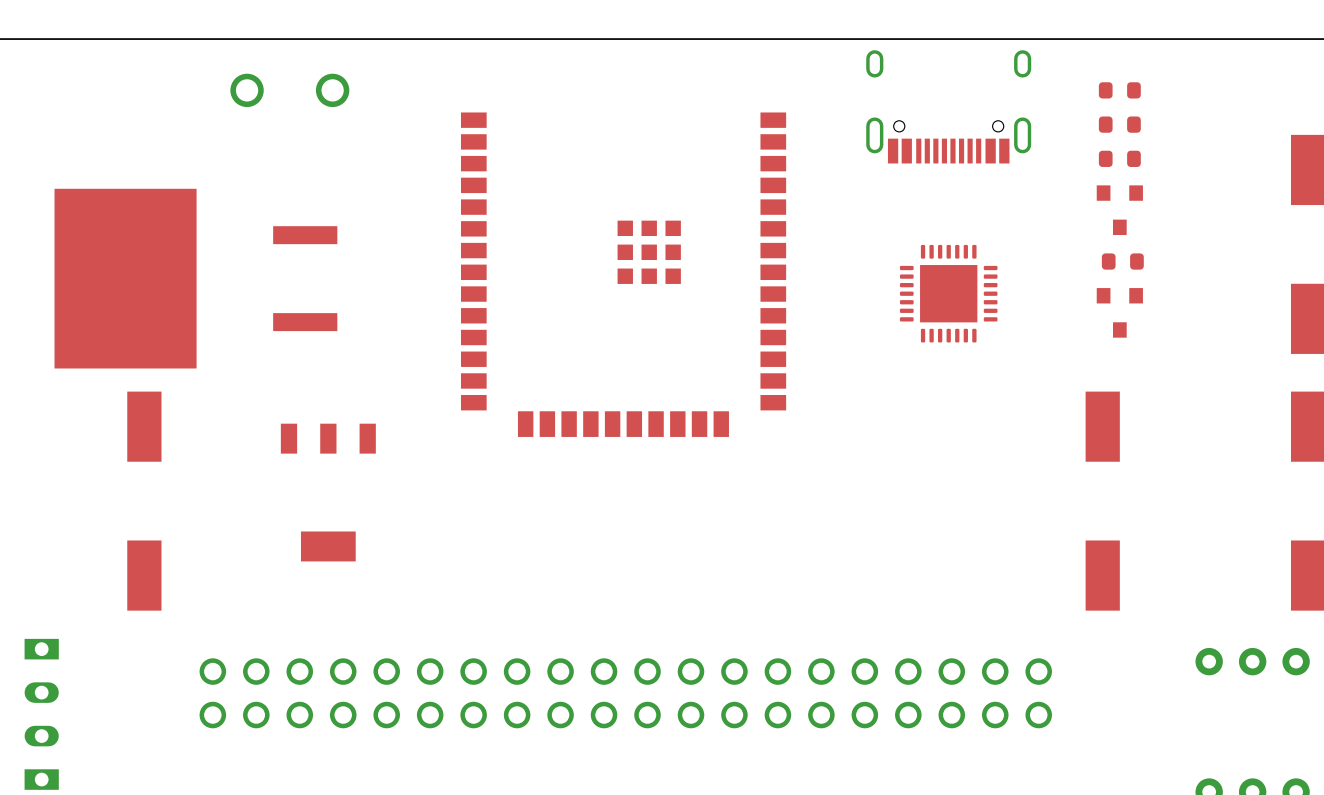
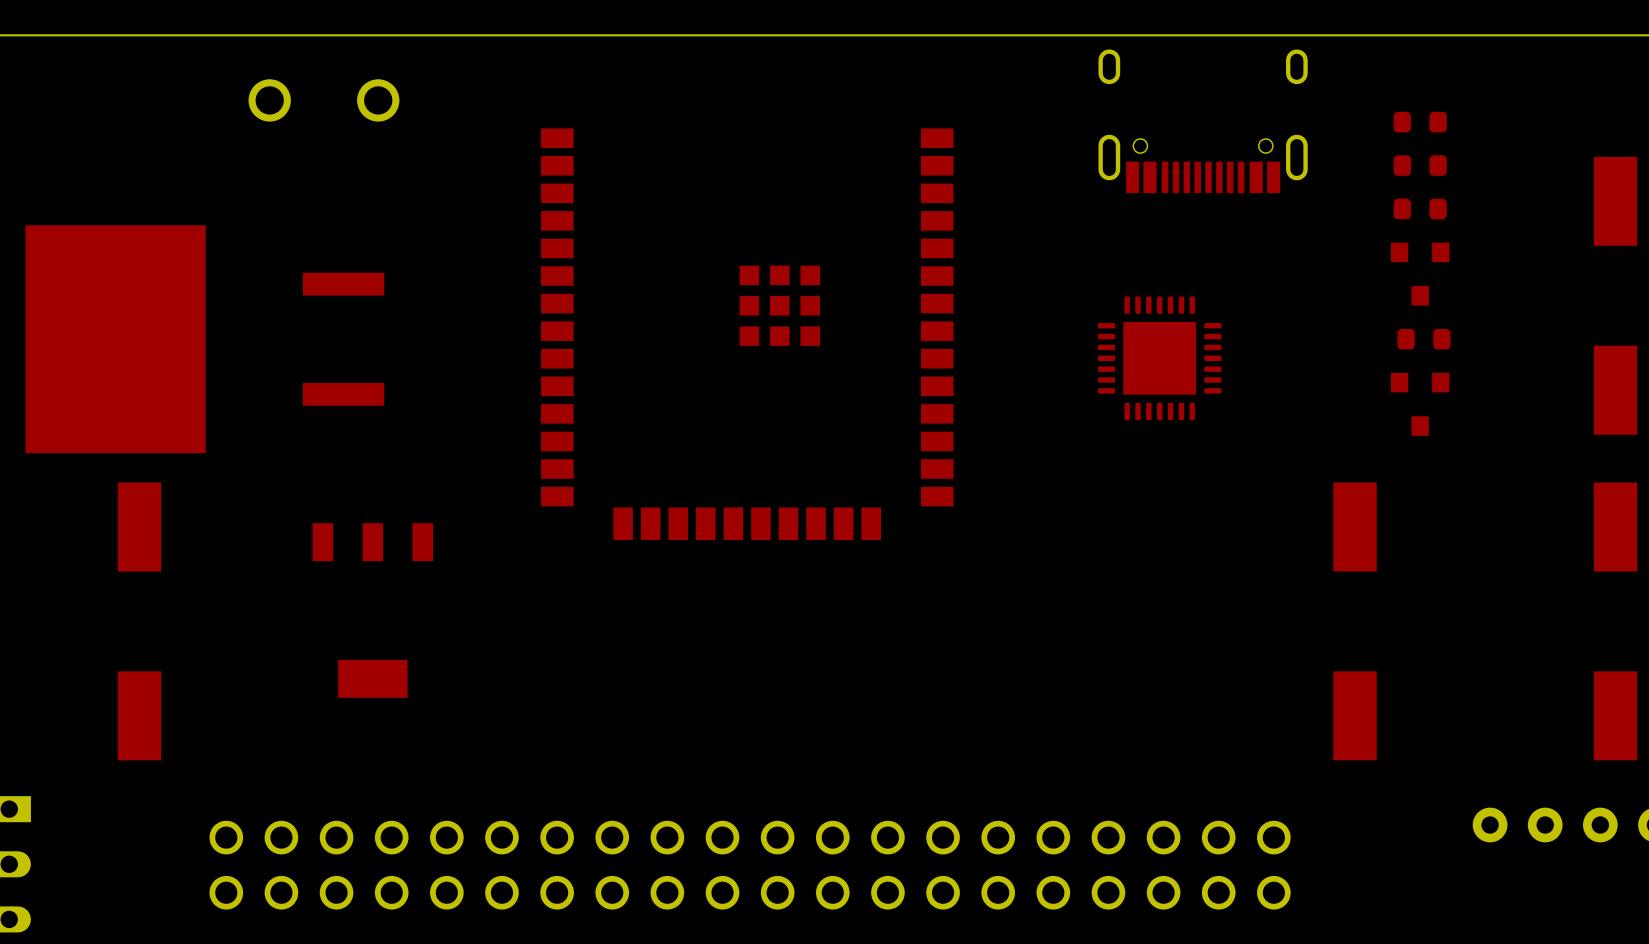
part: (1119, 90) -> none
part position: (948, 106) -> (1203, 121)
part: none -> (1420, 122)
part: (1119, 124) -> none
part: none -> (1420, 165)
part: (1119, 158) -> none
part: none -> (1420, 208)
part position: (1119, 210) -> (1420, 274)
part position: (1122, 261) -> (1423, 339)
part position: (1119, 312) -> (1420, 404)

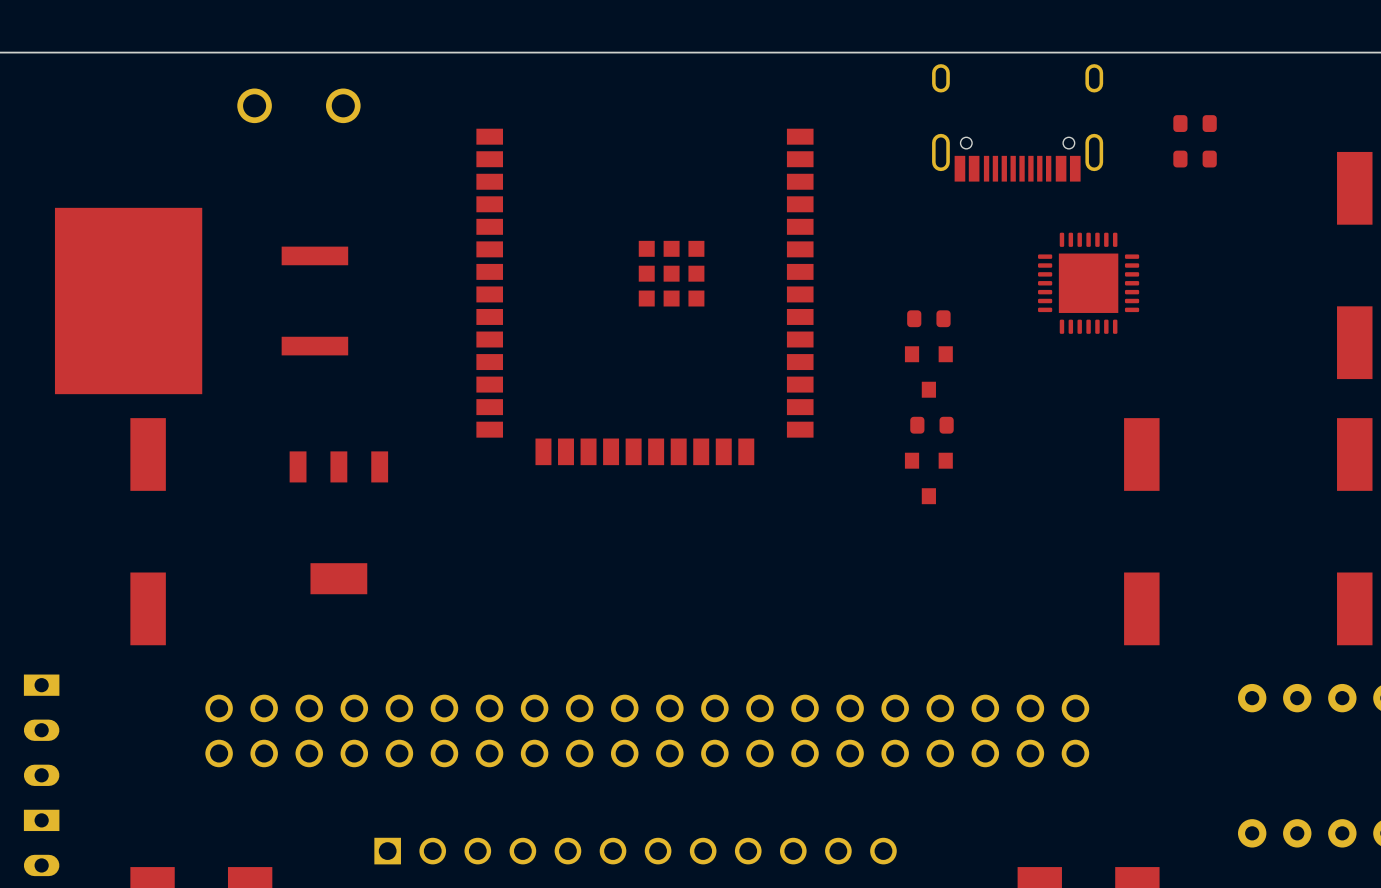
part: (1420, 208) -> none
part: (1420, 274) -> none
part: (1423, 339) -> none
part position: (1159, 358) -> (1088, 283)
part: none -> (928, 318)
part: (1420, 404) -> none
part: none -> (928, 371)
part: none -> (931, 425)
part: none -> (928, 478)

